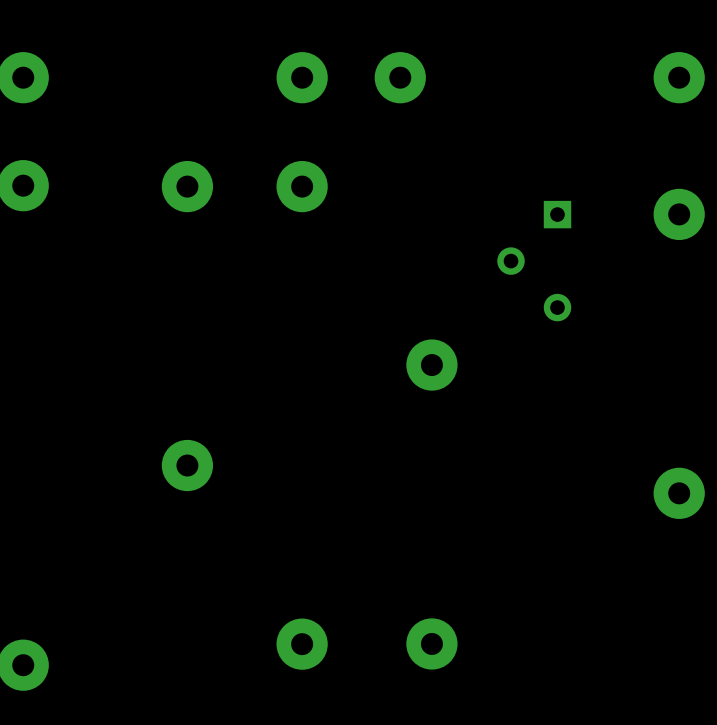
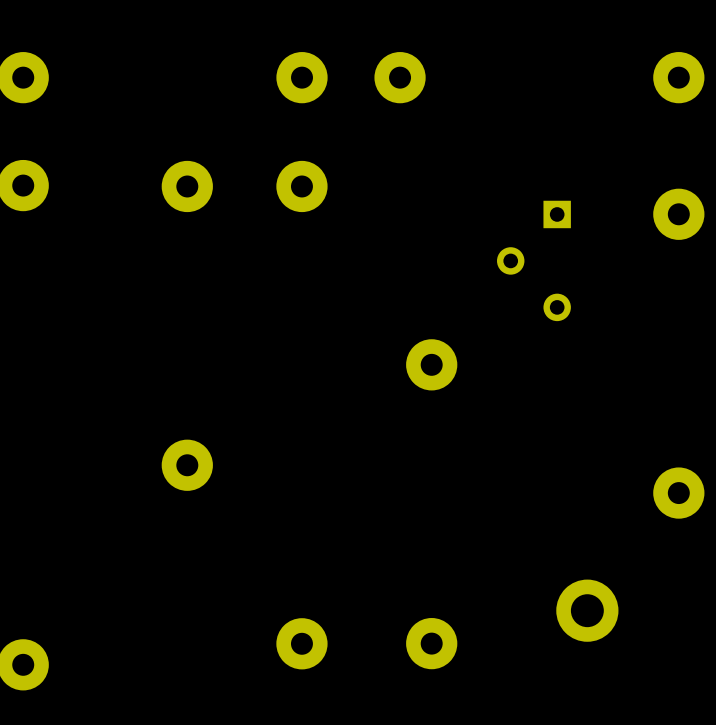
part: none -> (587, 610)

